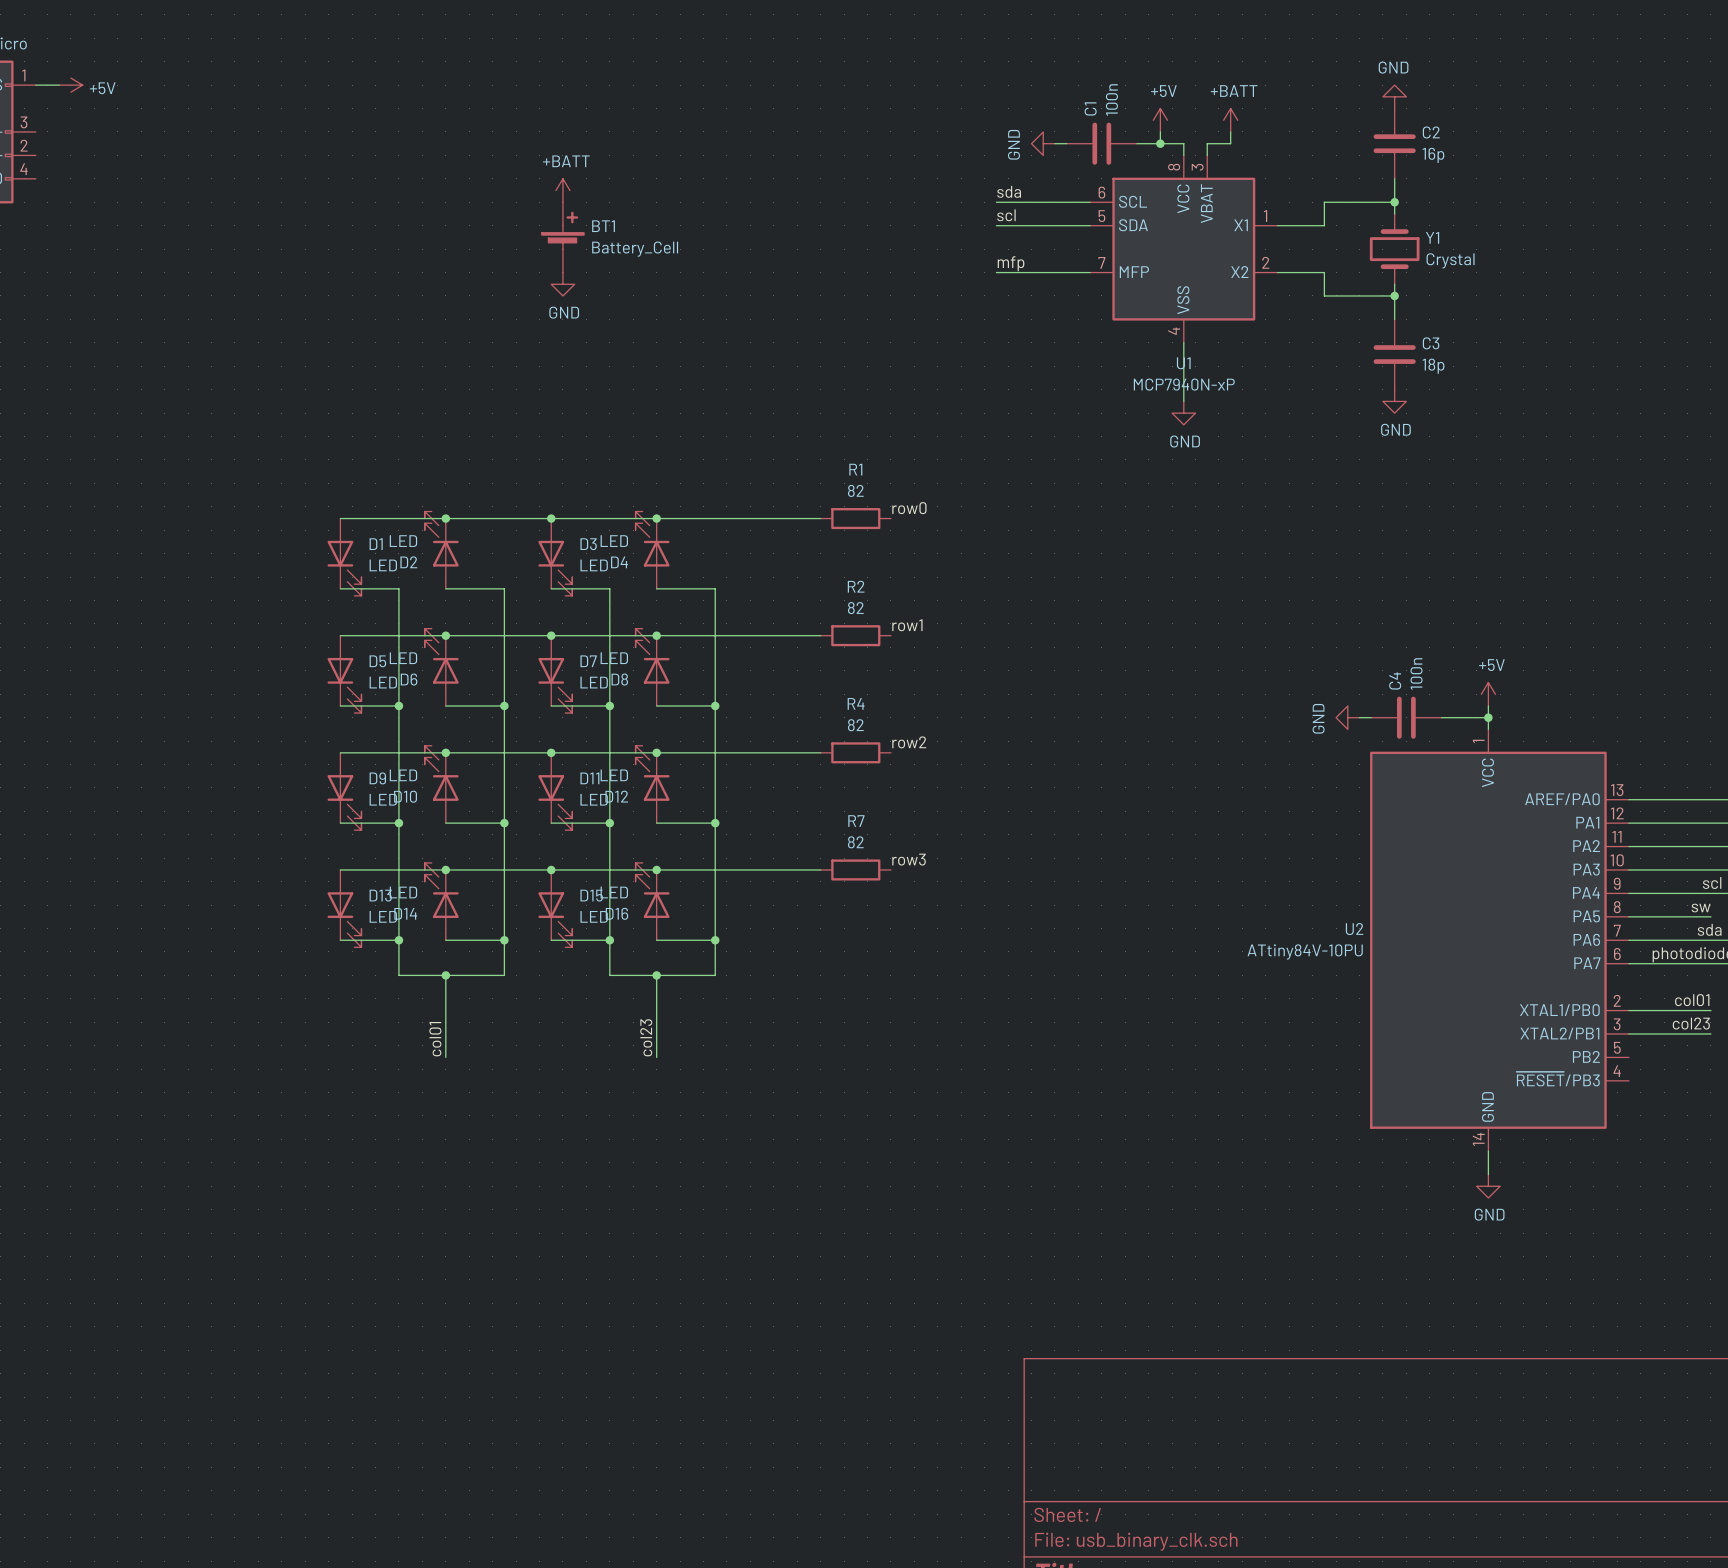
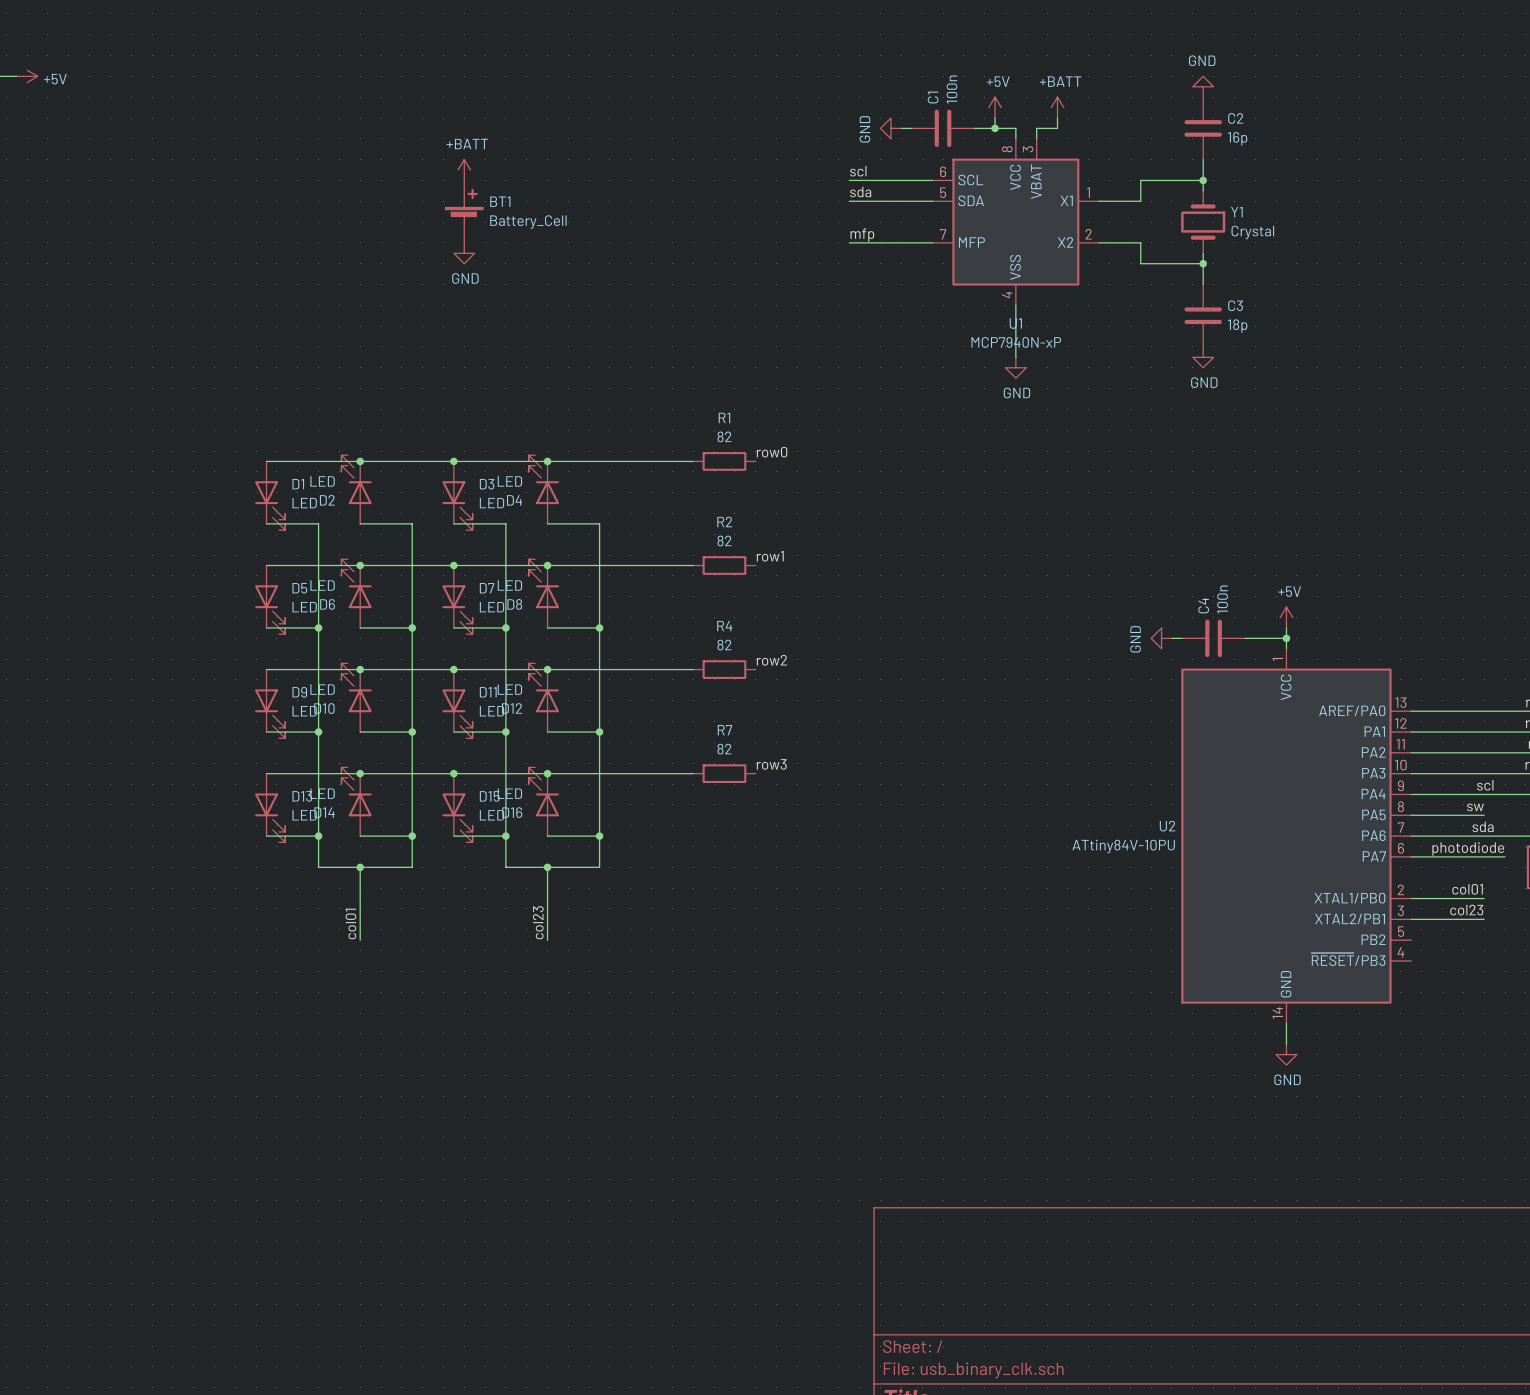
label: sda (1009, 191) -> scl (858, 171)
label: scl (1006, 215) -> sda (860, 192)

